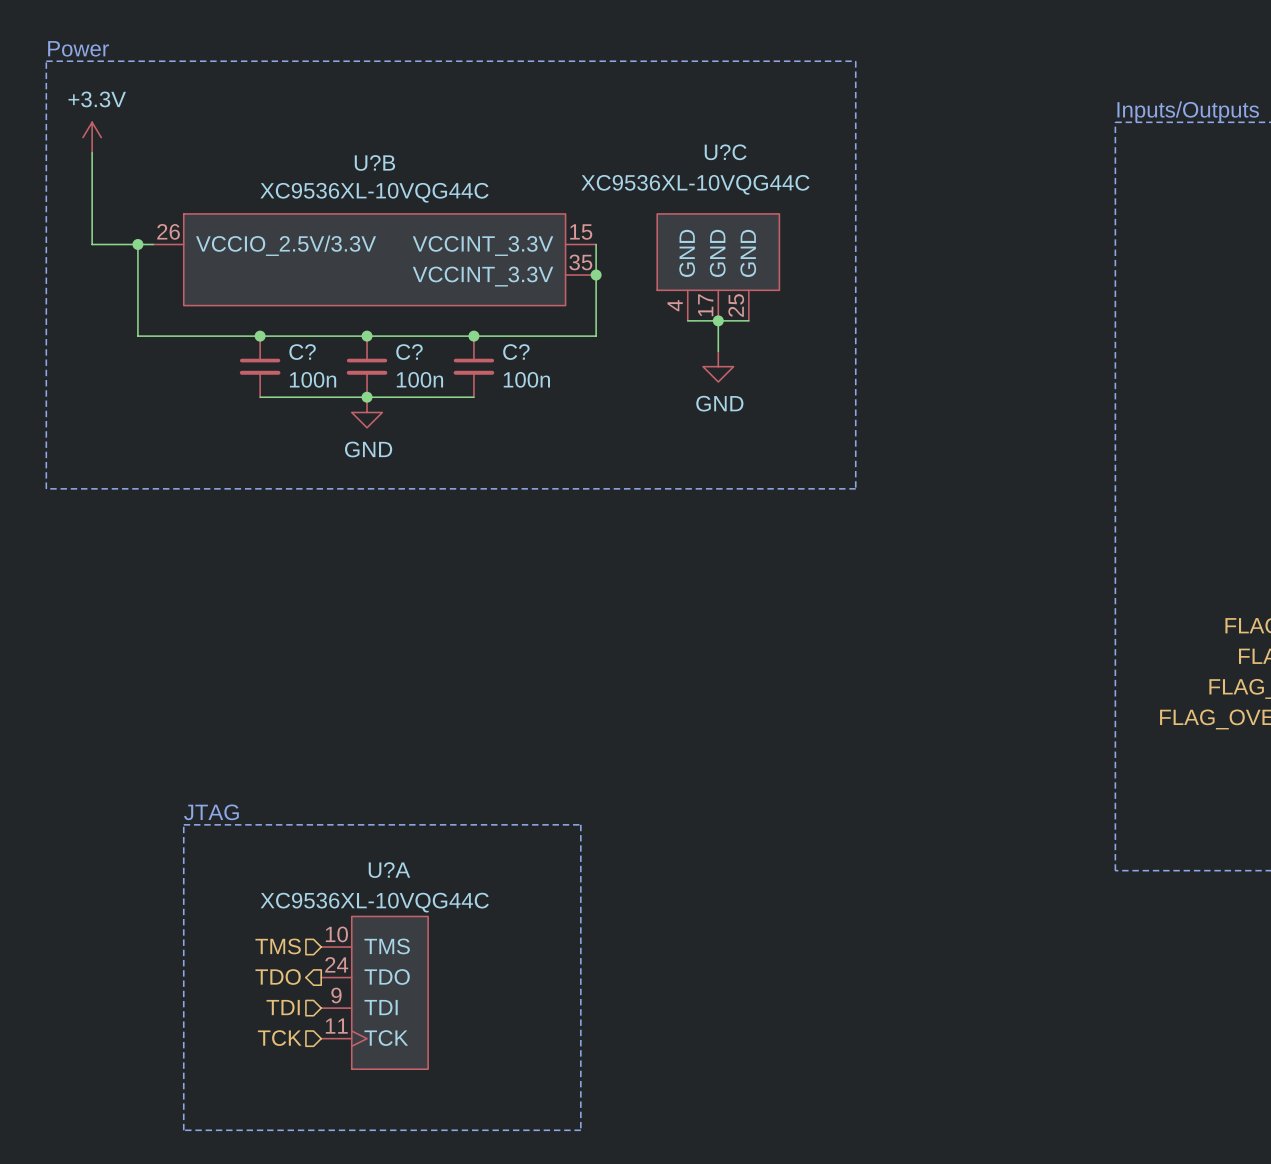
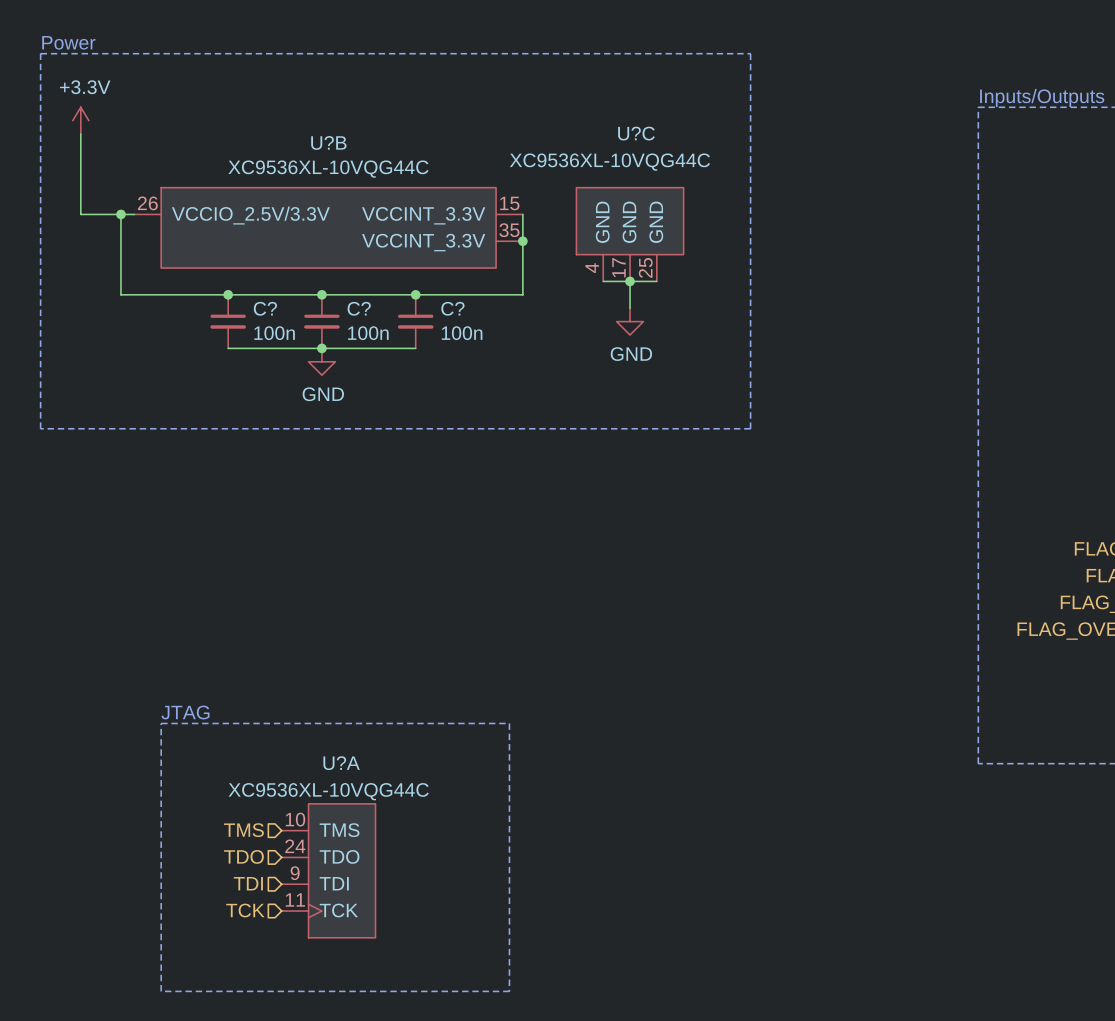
hierarchical label shape: output (278, 976) -> input (243, 856)

